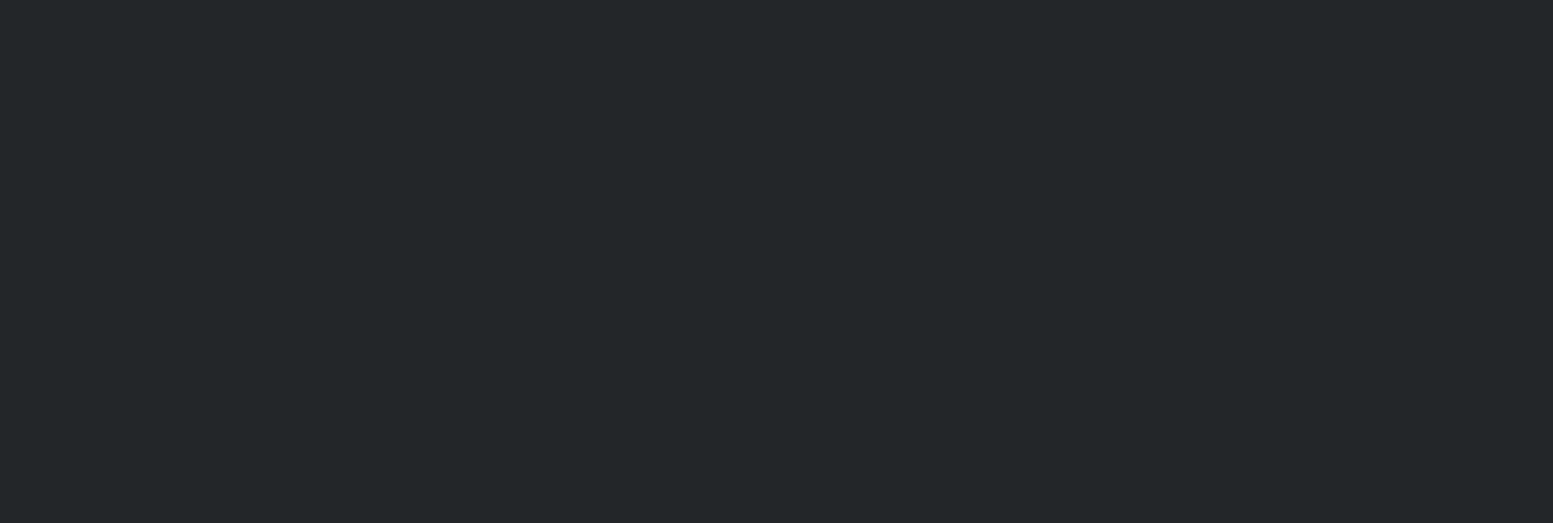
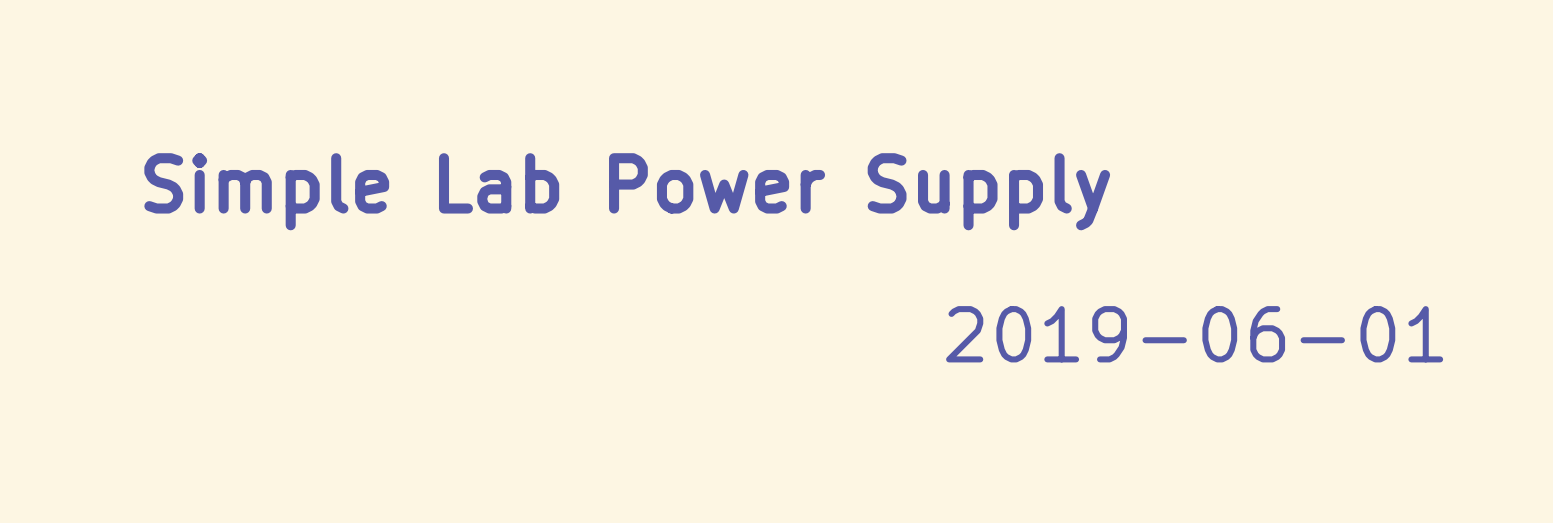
text: none -> Simple Lab Power Supply (627, 191)
text: none -> 2019-06-01 (1194, 334)

